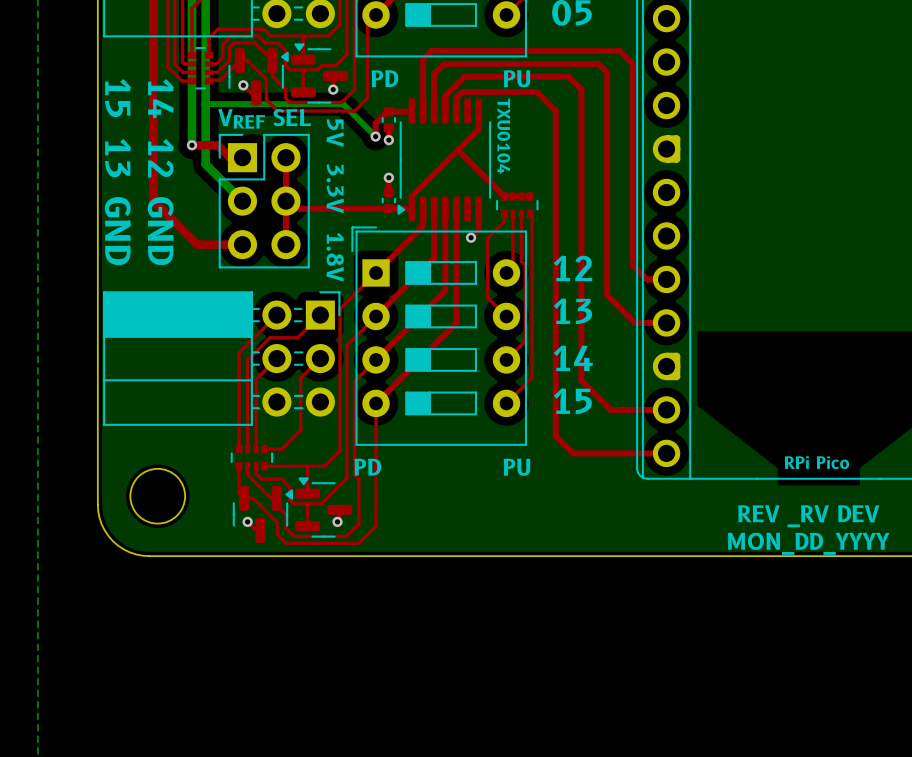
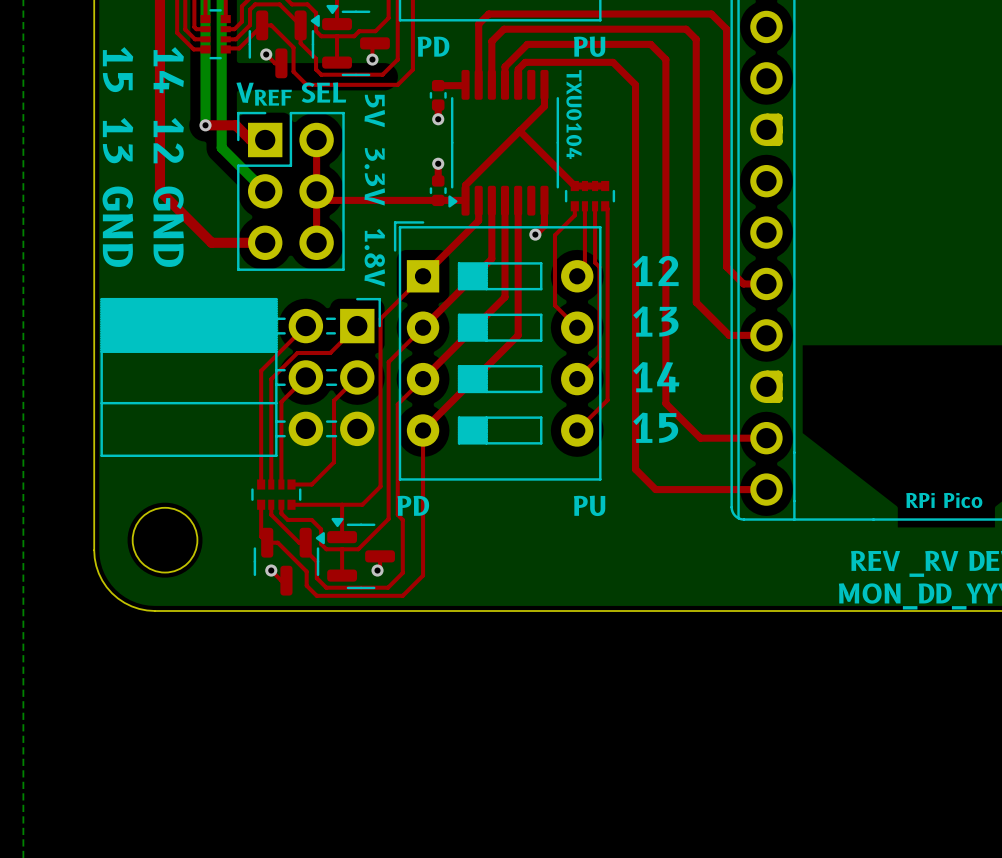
bottom track: (205, 104) (343, 104) (375, 136) -> none
top track: (387, 111) (375, 123) (375, 136) -> none
via: (375, 136) -> none

